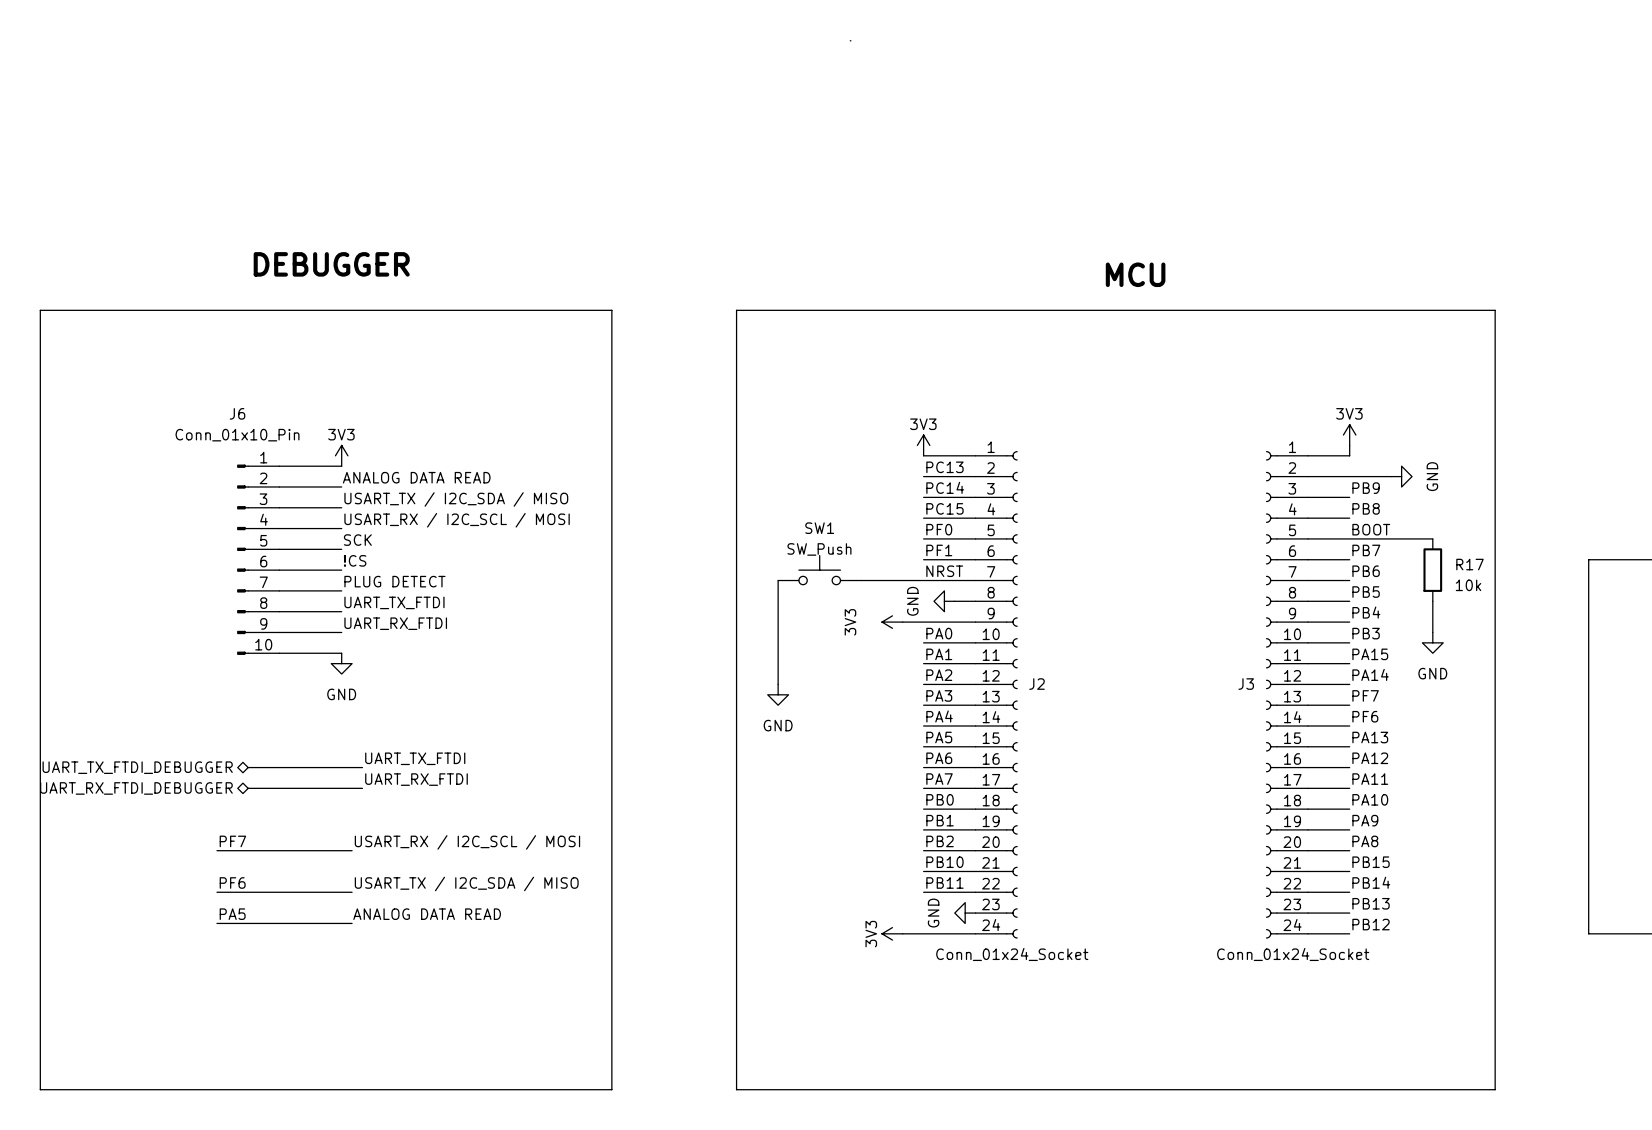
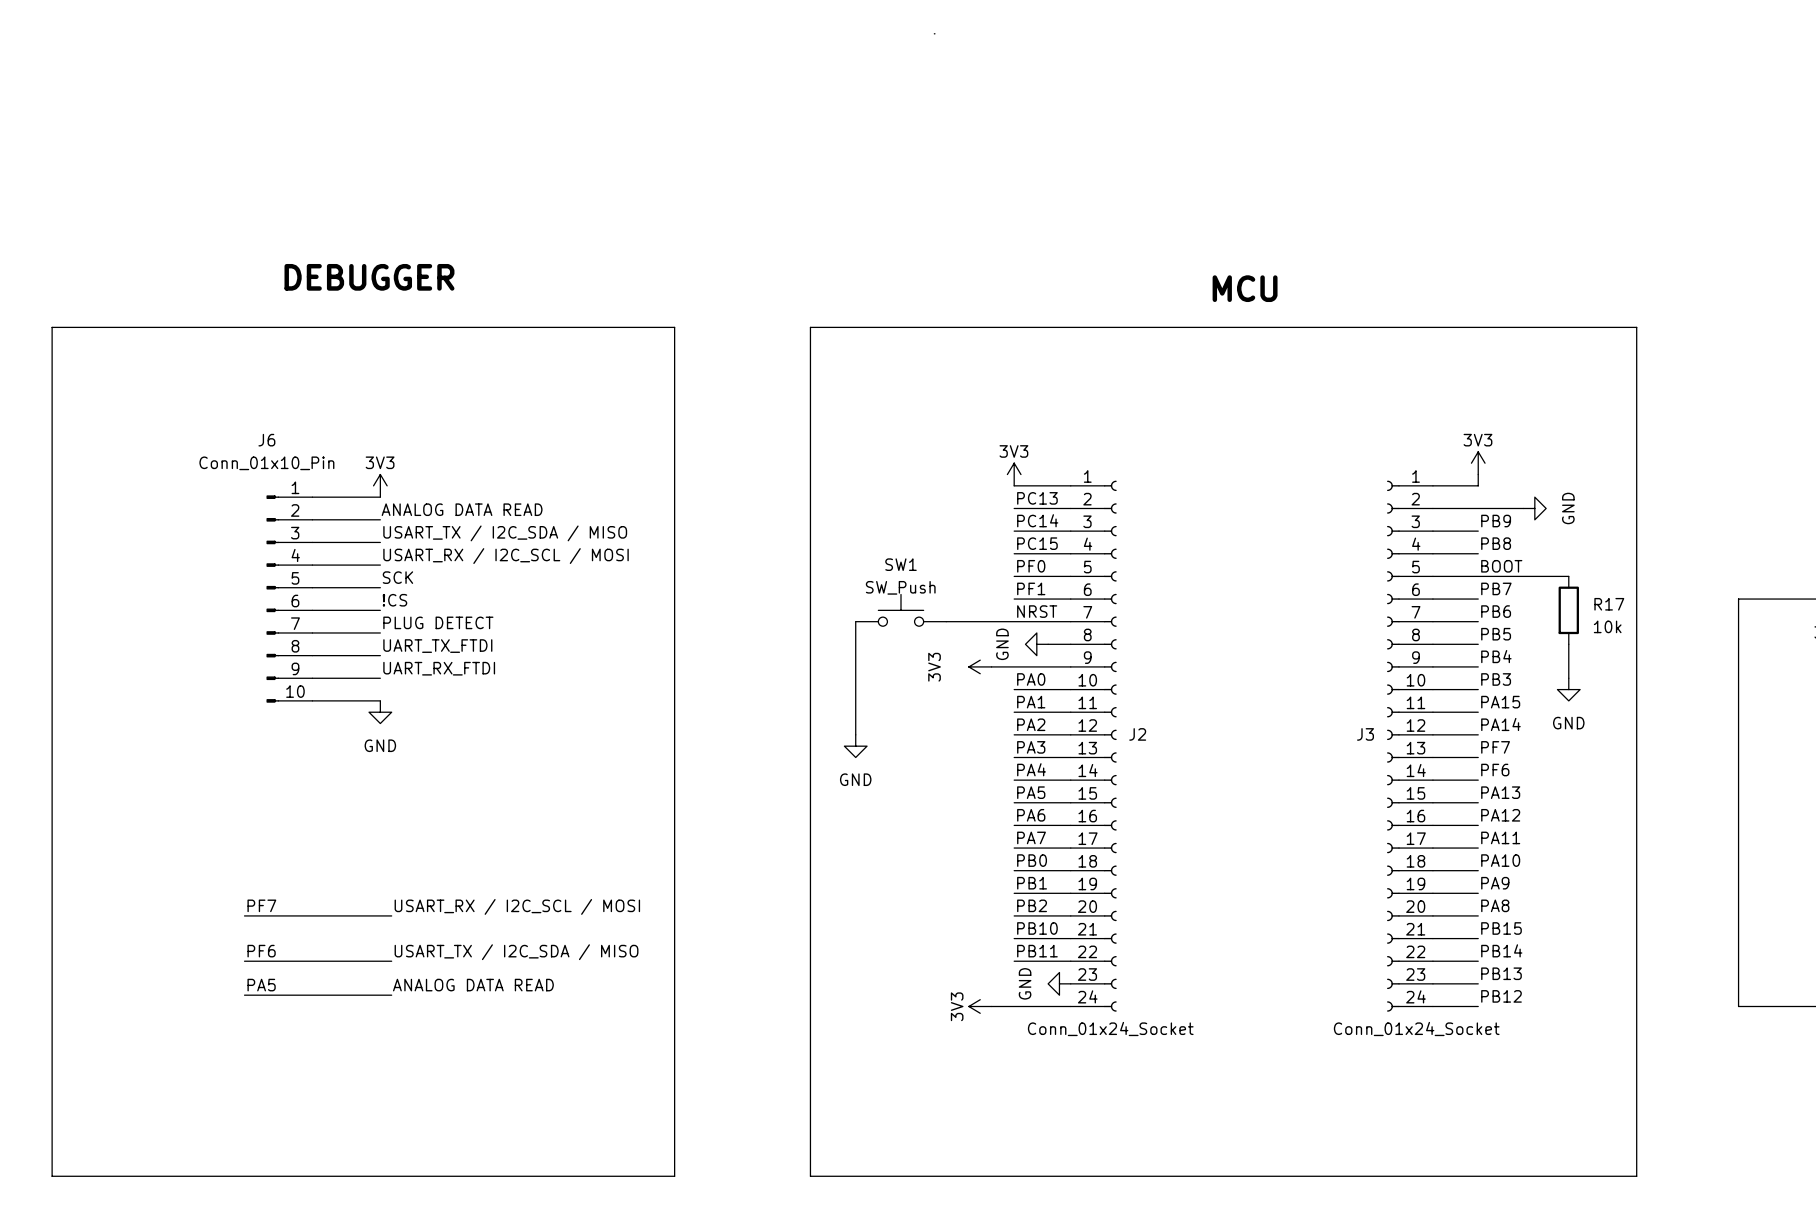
label: UART_TX_FTDI (415, 758) -> none
hierarchical label: UART_TX_FTDI_DEBUGGER (137, 767) -> none
wire: (248, 767) (362, 767) -> none
label: UART_RX_FTDI (416, 779) -> none
hierarchical label: UART_RX_FTDI_DEBUGGER (136, 788) -> none
wire: (248, 788) (362, 788) -> none

